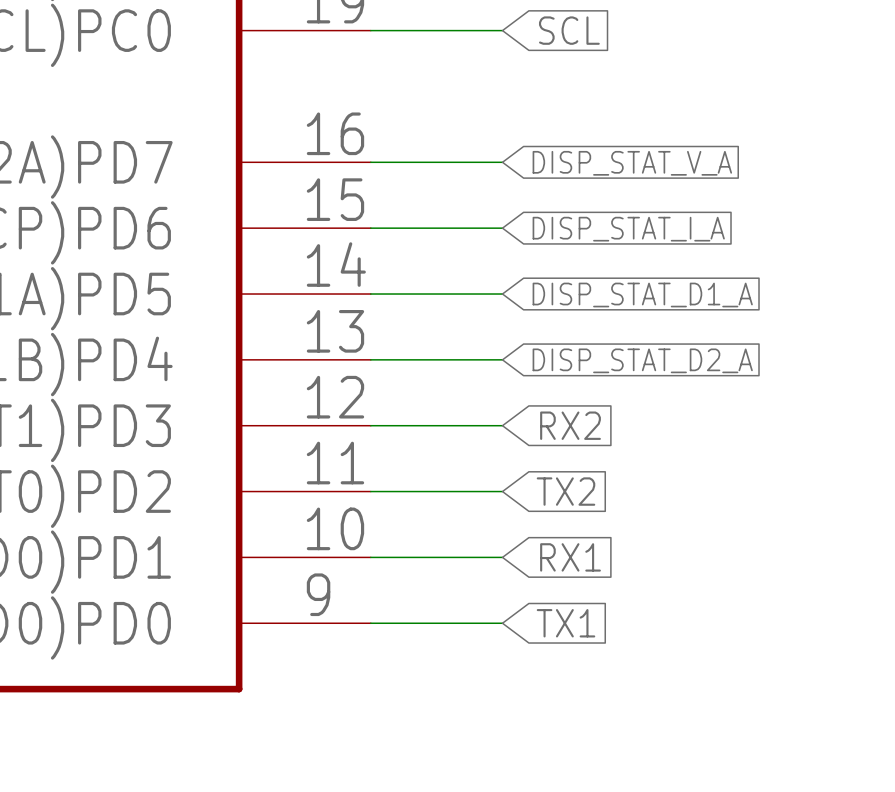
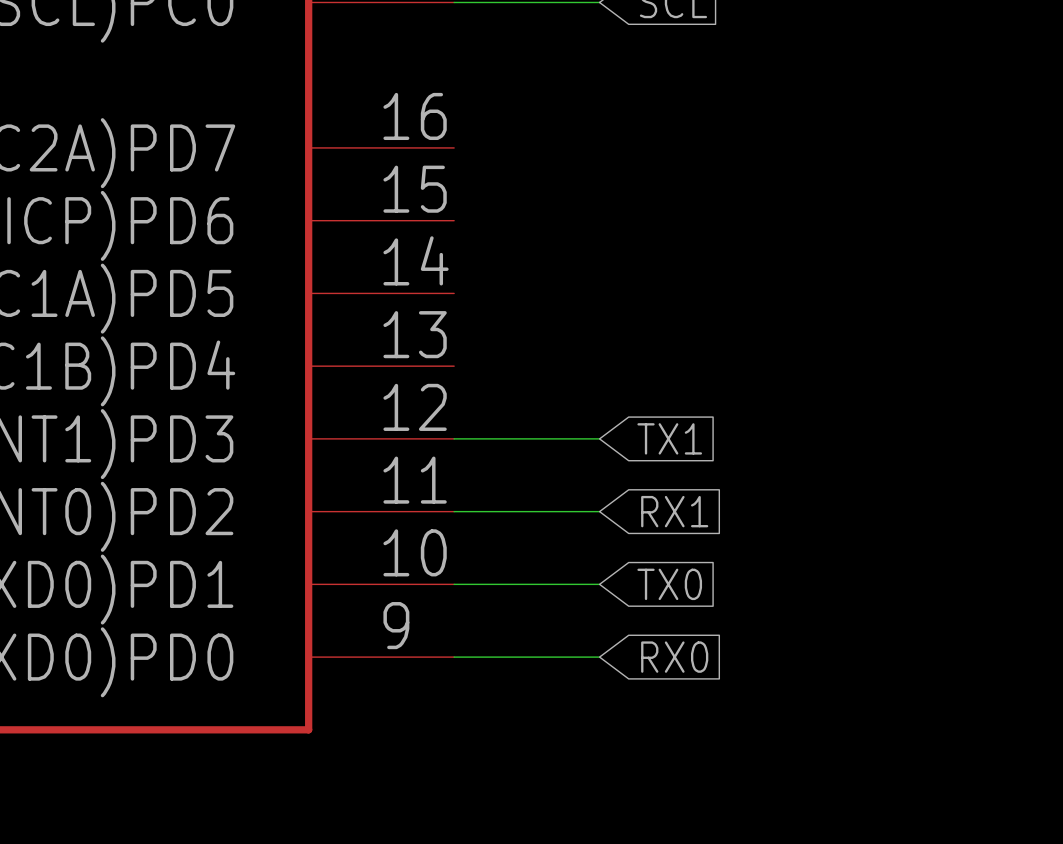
wire: (370, 162) (502, 162) -> none
global label: DISP_STAT_V_A (632, 163) -> none
wire: (370, 228) (502, 228) -> none
global label: DISP_STAT_I_A (628, 229) -> none
wire: (370, 294) (502, 294) -> none
global label: DISP_STAT_D1_A (642, 295) -> none
wire: (370, 359) (502, 359) -> none
global label: DISP_STAT_D2_A (642, 360) -> none
global label: RX2 (570, 425) -> TX1 (669, 438)
global label: TX2 (566, 491) -> RX1 (674, 511)
global label: RX1 (570, 557) -> TX0 (669, 584)
global label: TX1 (566, 623) -> RX0 (674, 657)

